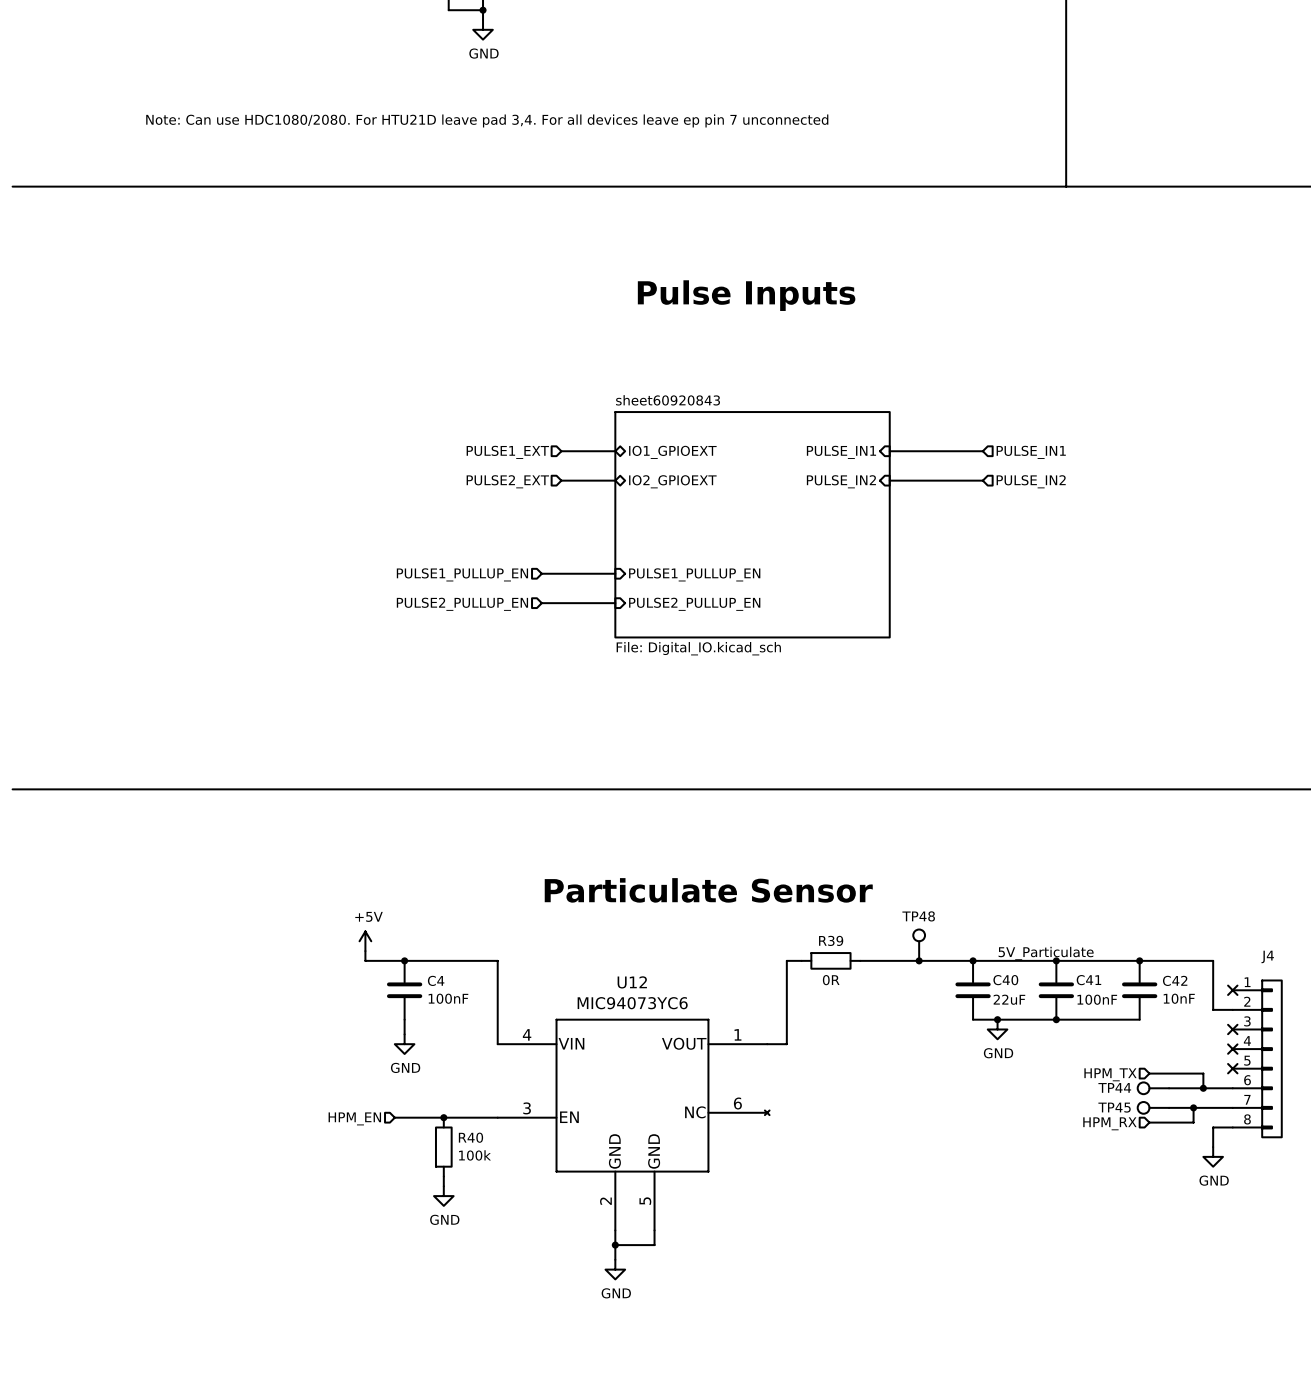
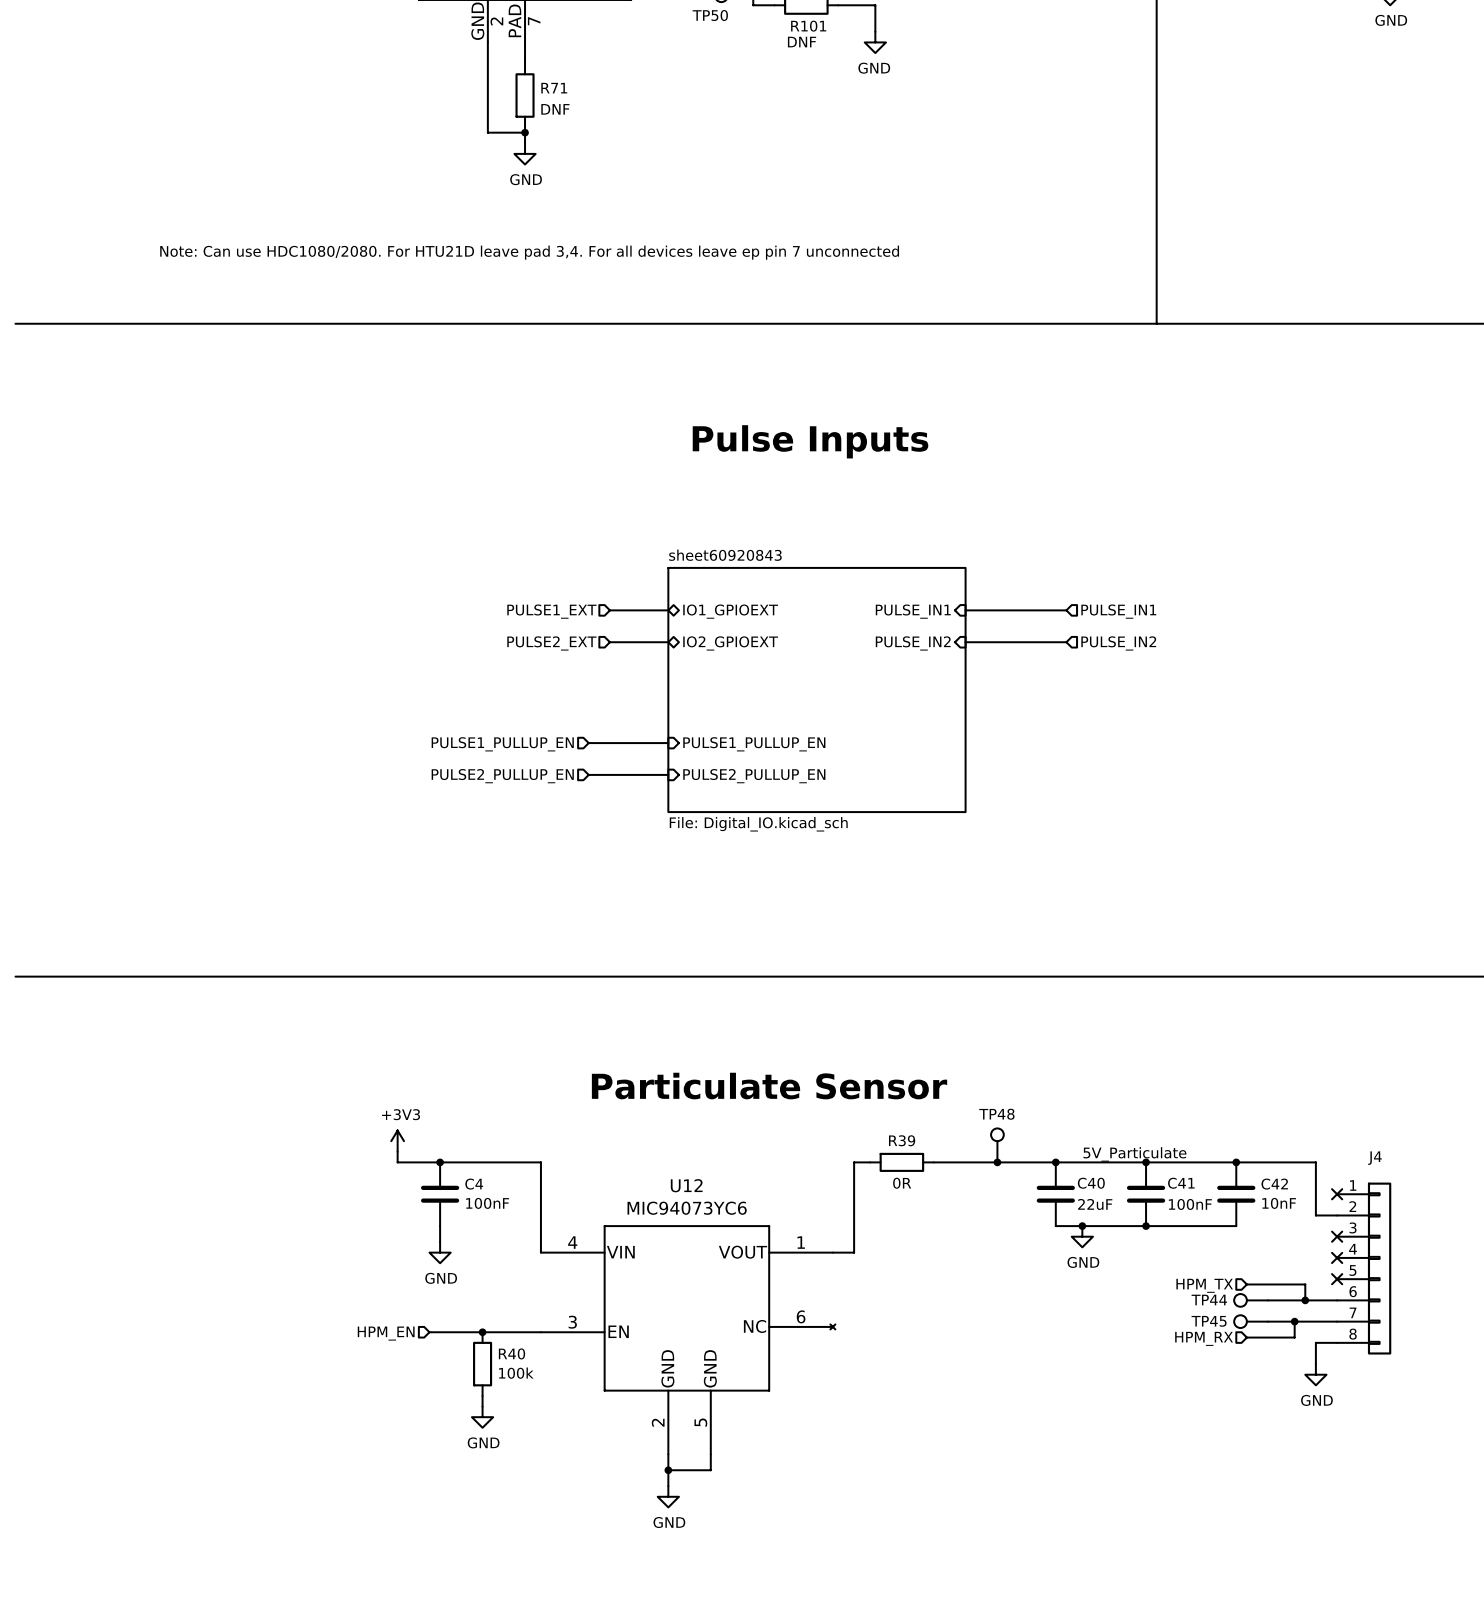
power symbol: +5V (365, 941) -> +3V3 (397, 1141)

